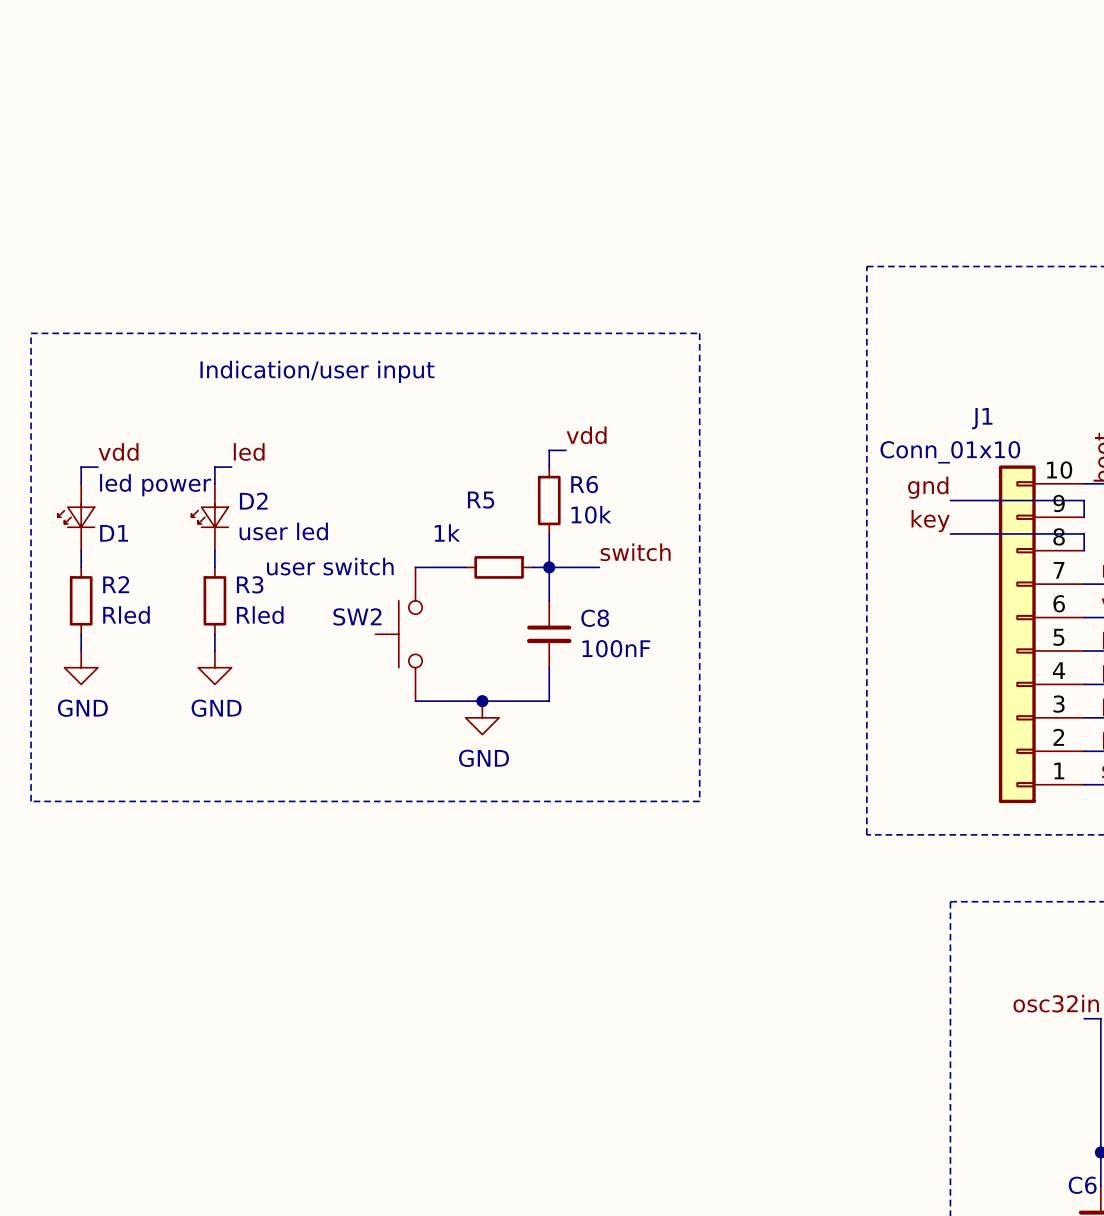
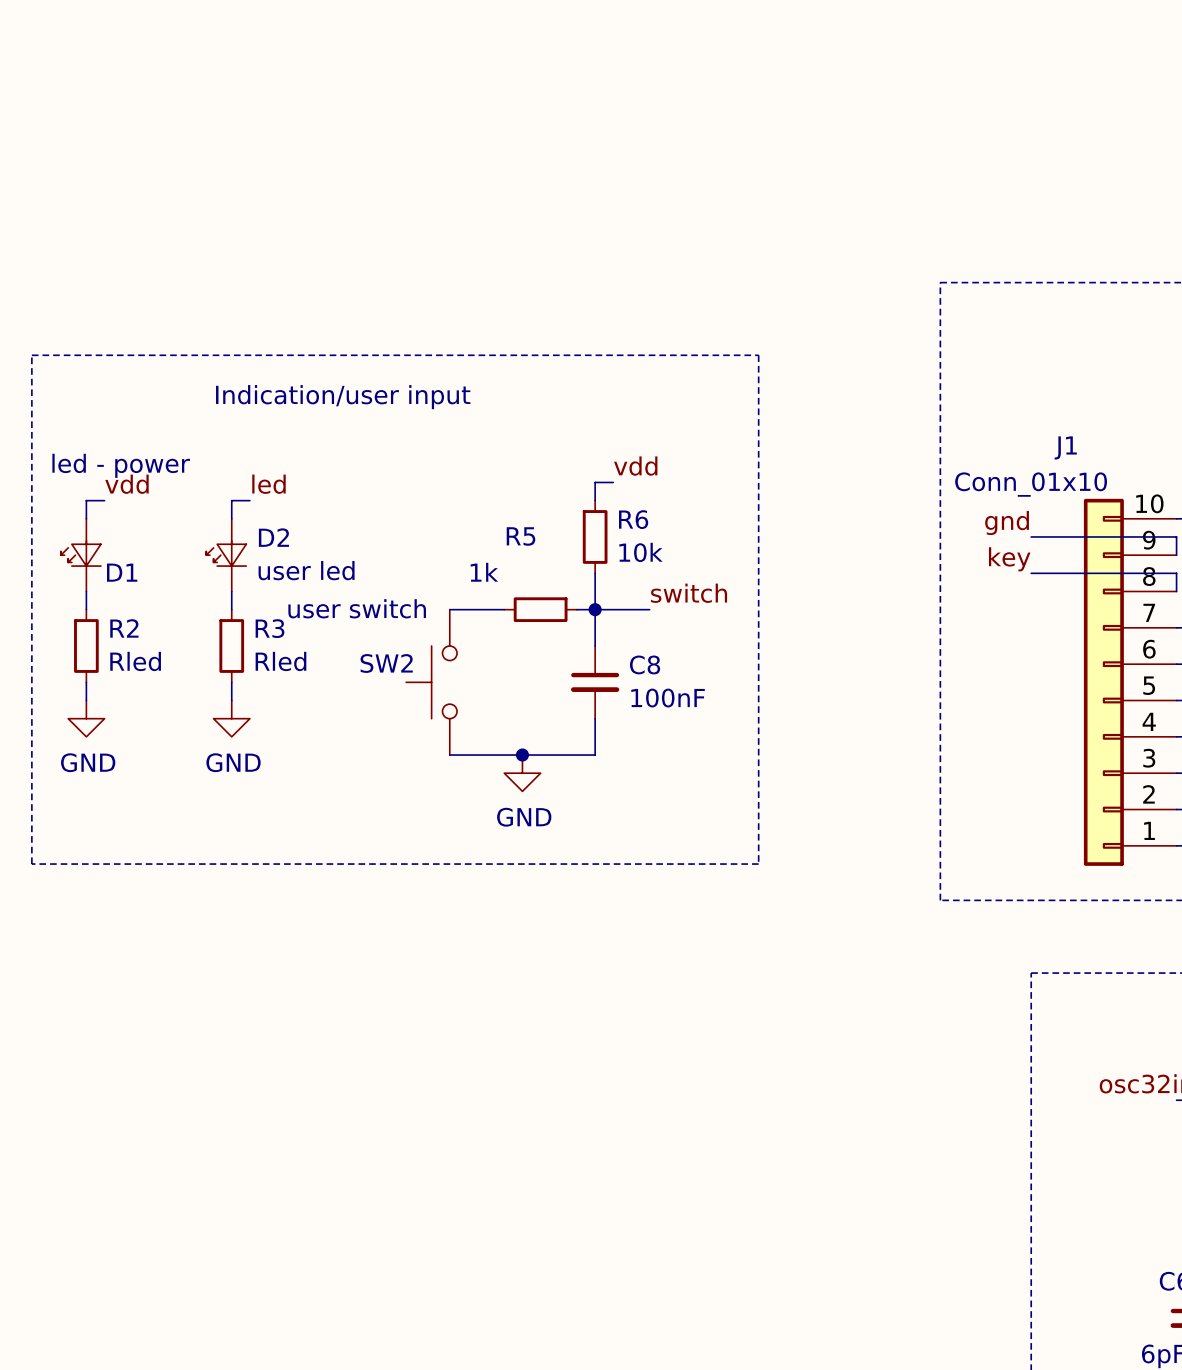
D1 value: led power (155, 485) -> led - power (121, 465)

